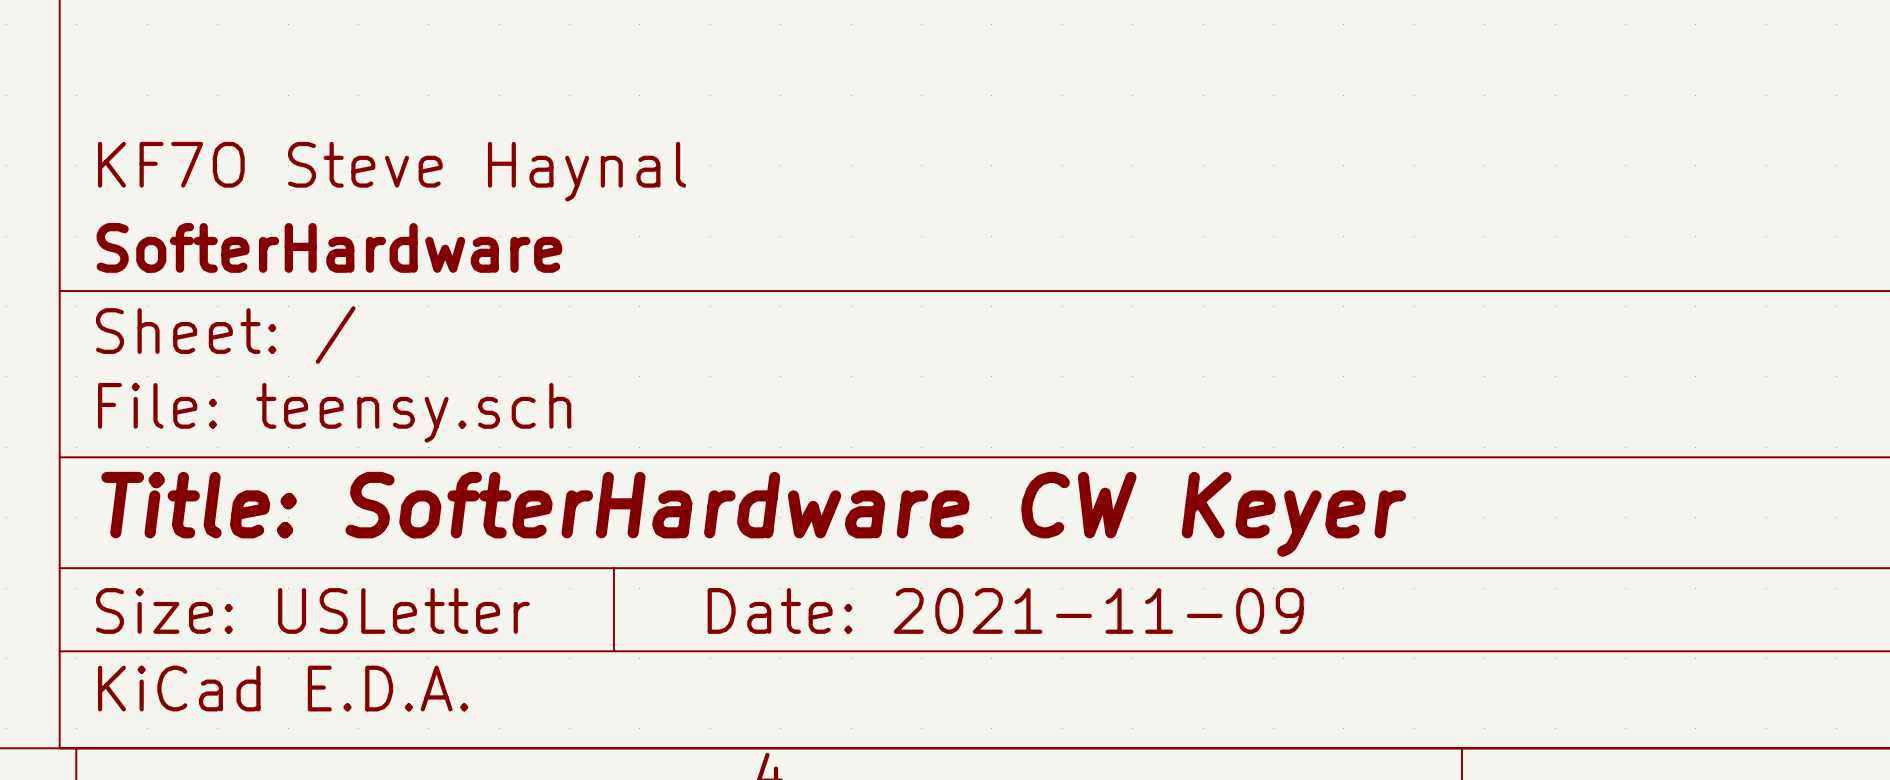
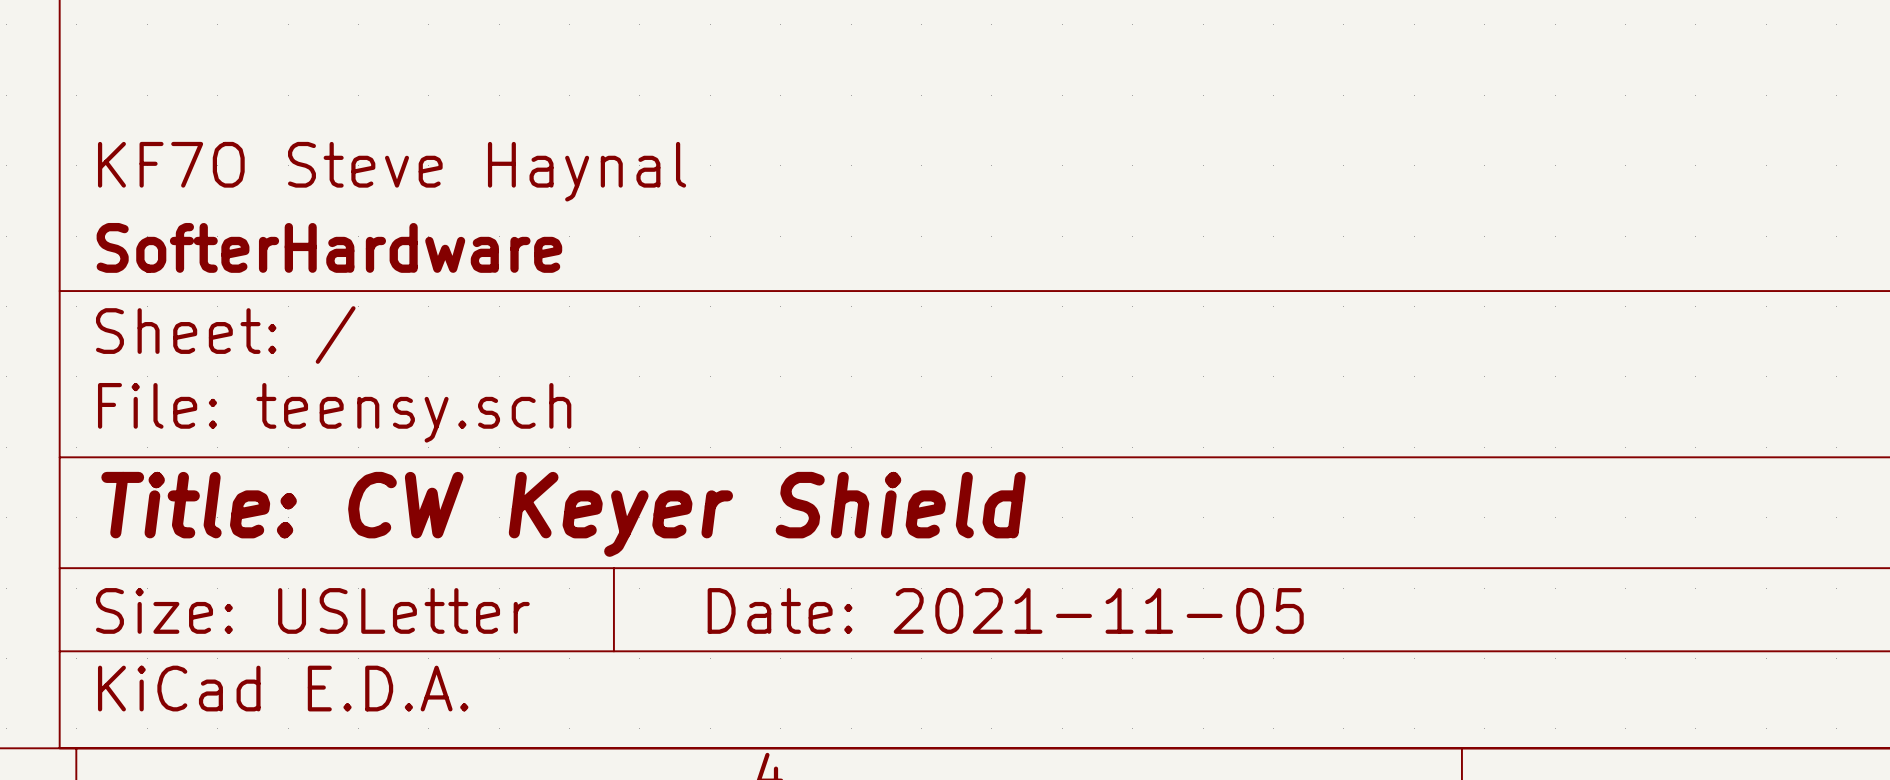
title block: Title: SofterHardware CW Keyer (753, 514) -> Title: CW Keyer Shield (563, 514)
title block: Date: 2021-11-09 (1005, 610) -> Date: 2021-11-05 (1005, 610)

